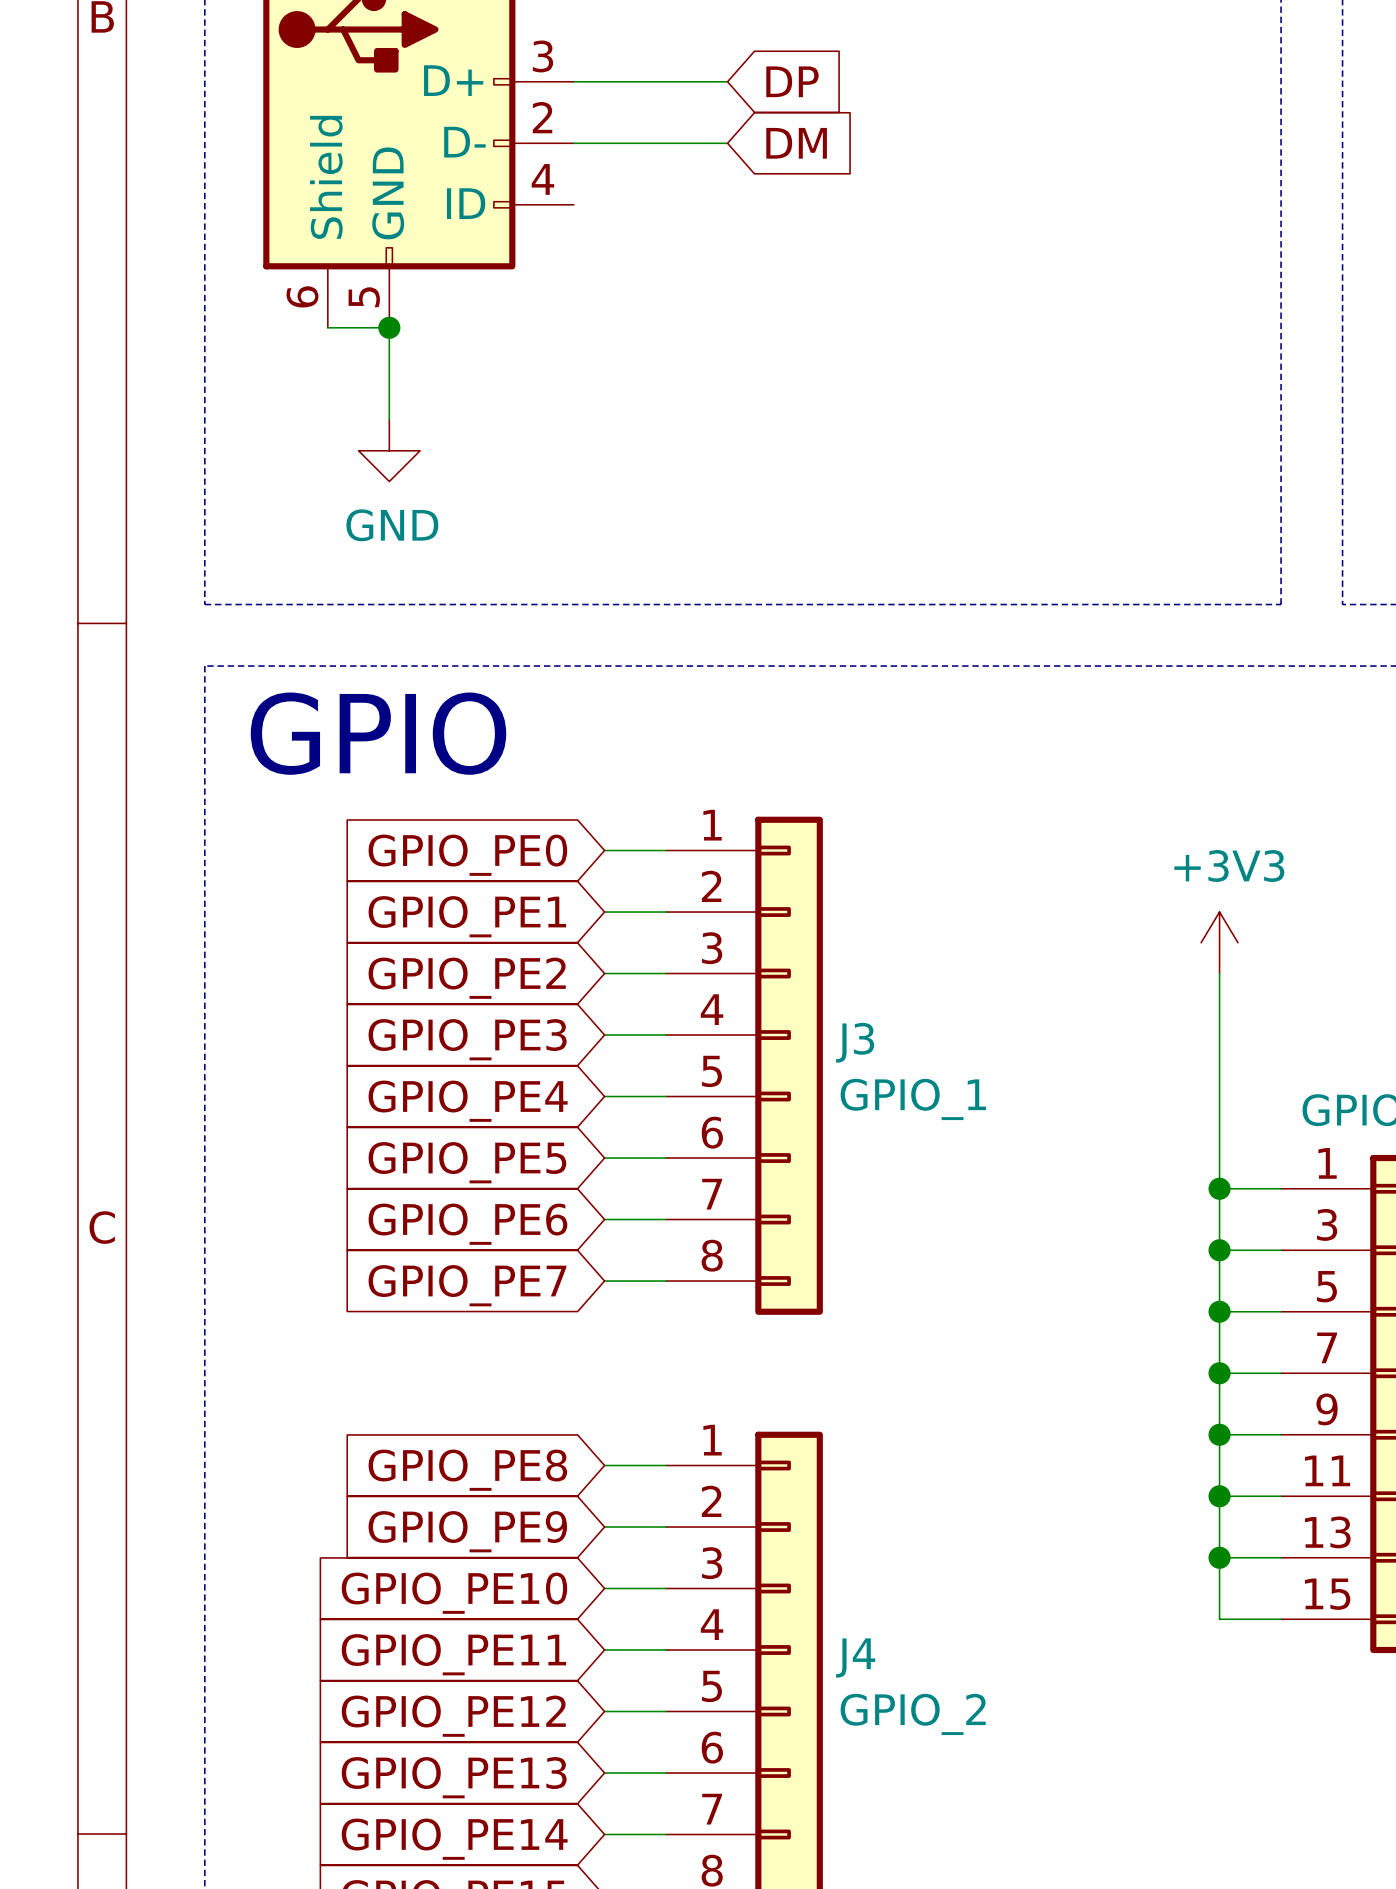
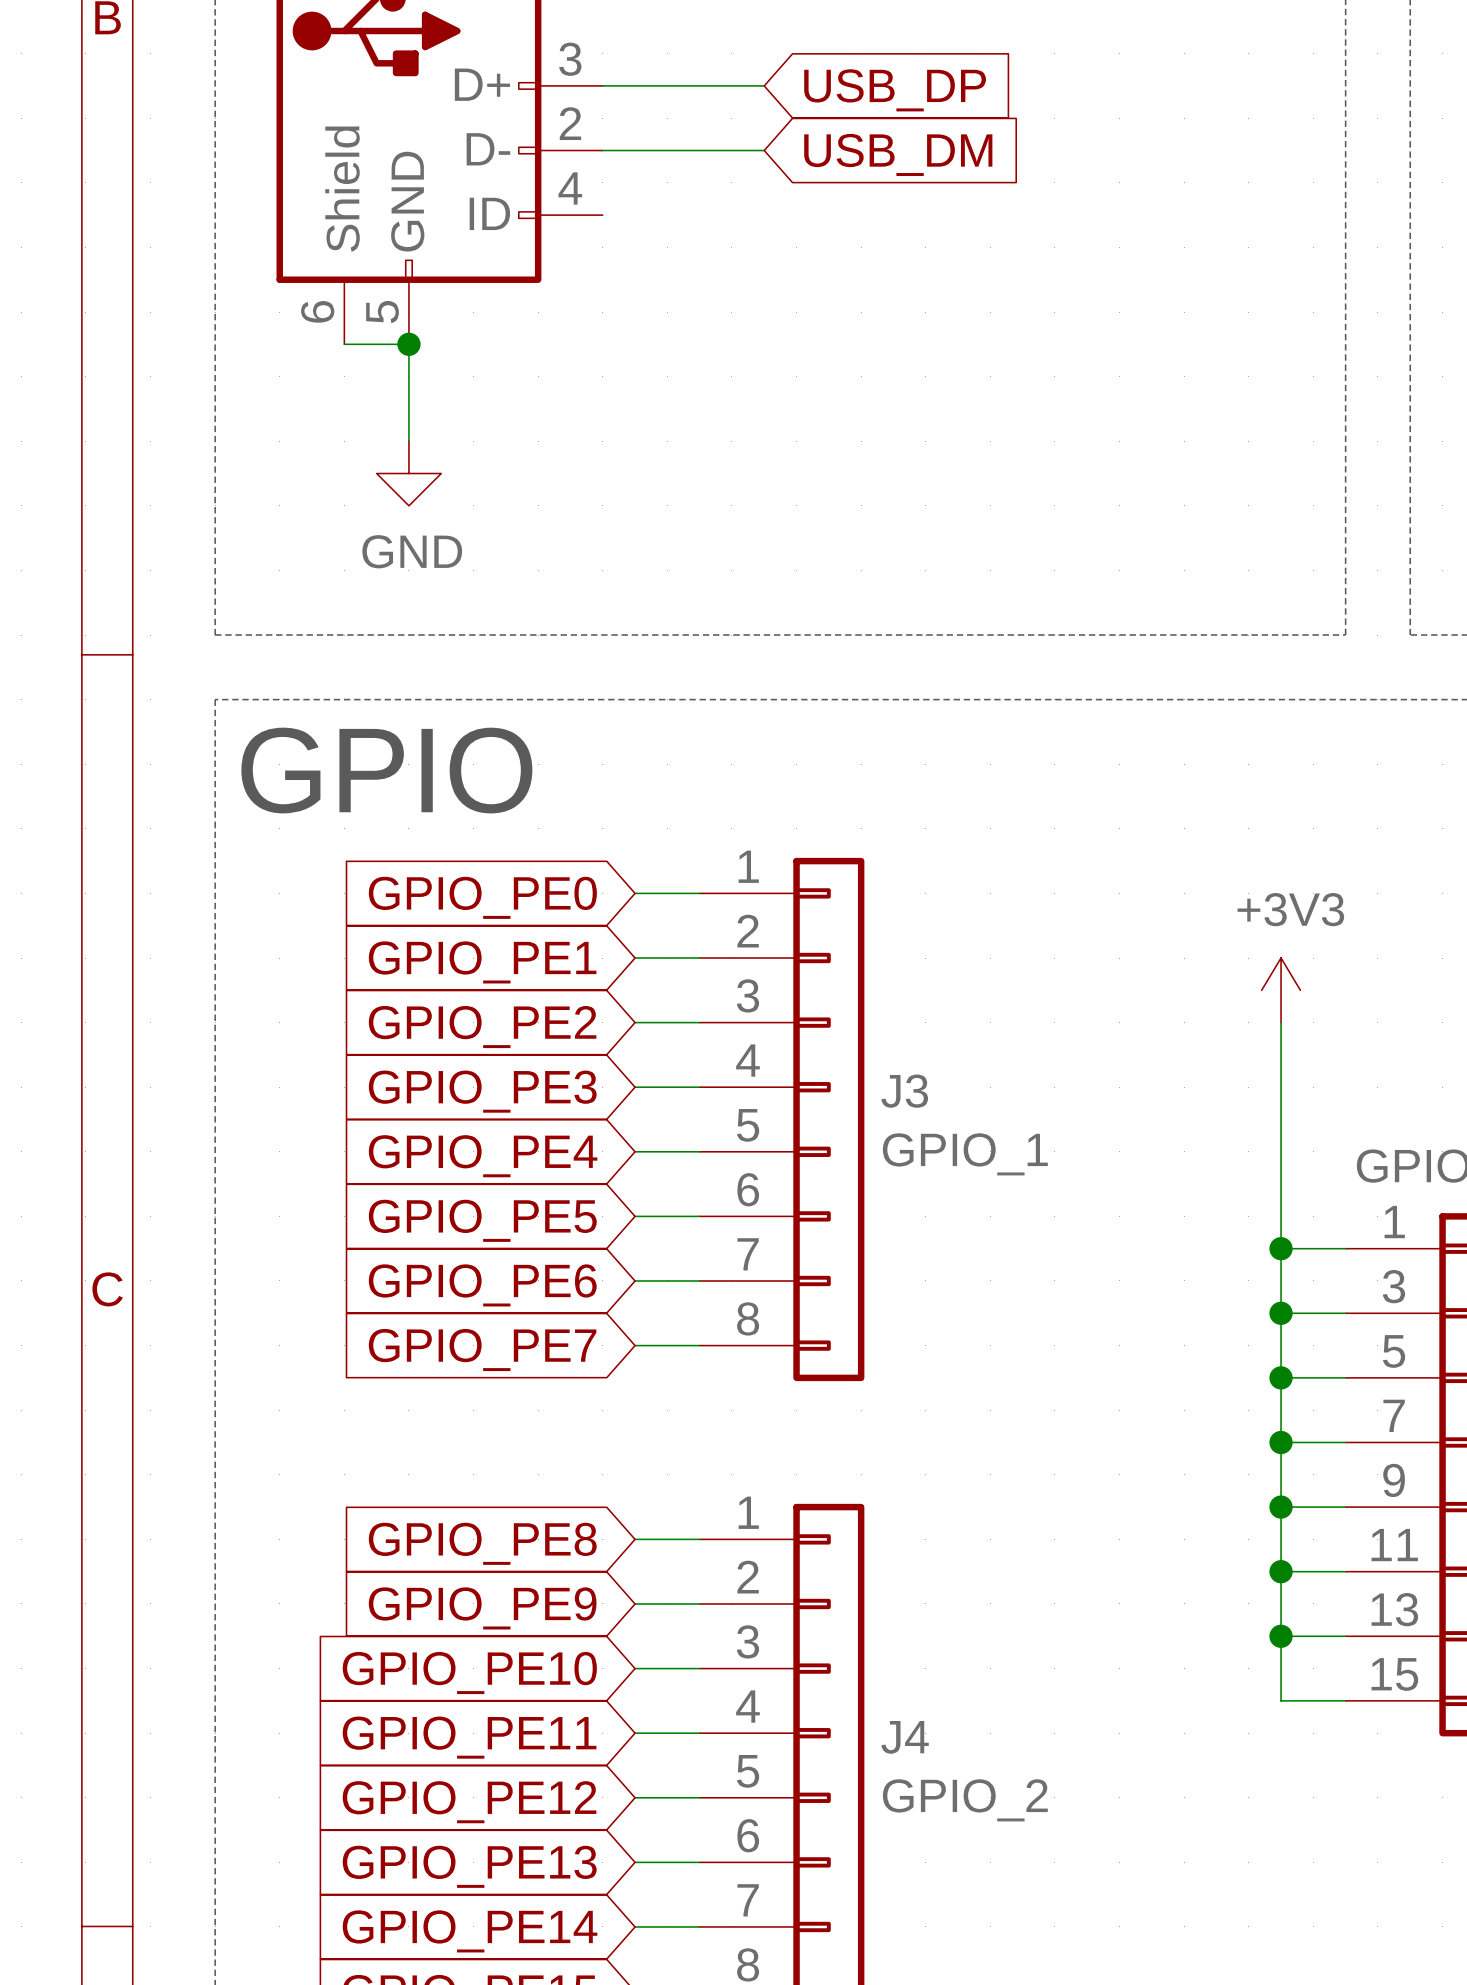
global label: DP (792, 81) -> USB_DP (895, 90)
global label: DM (796, 143) -> USB_DM (898, 154)

